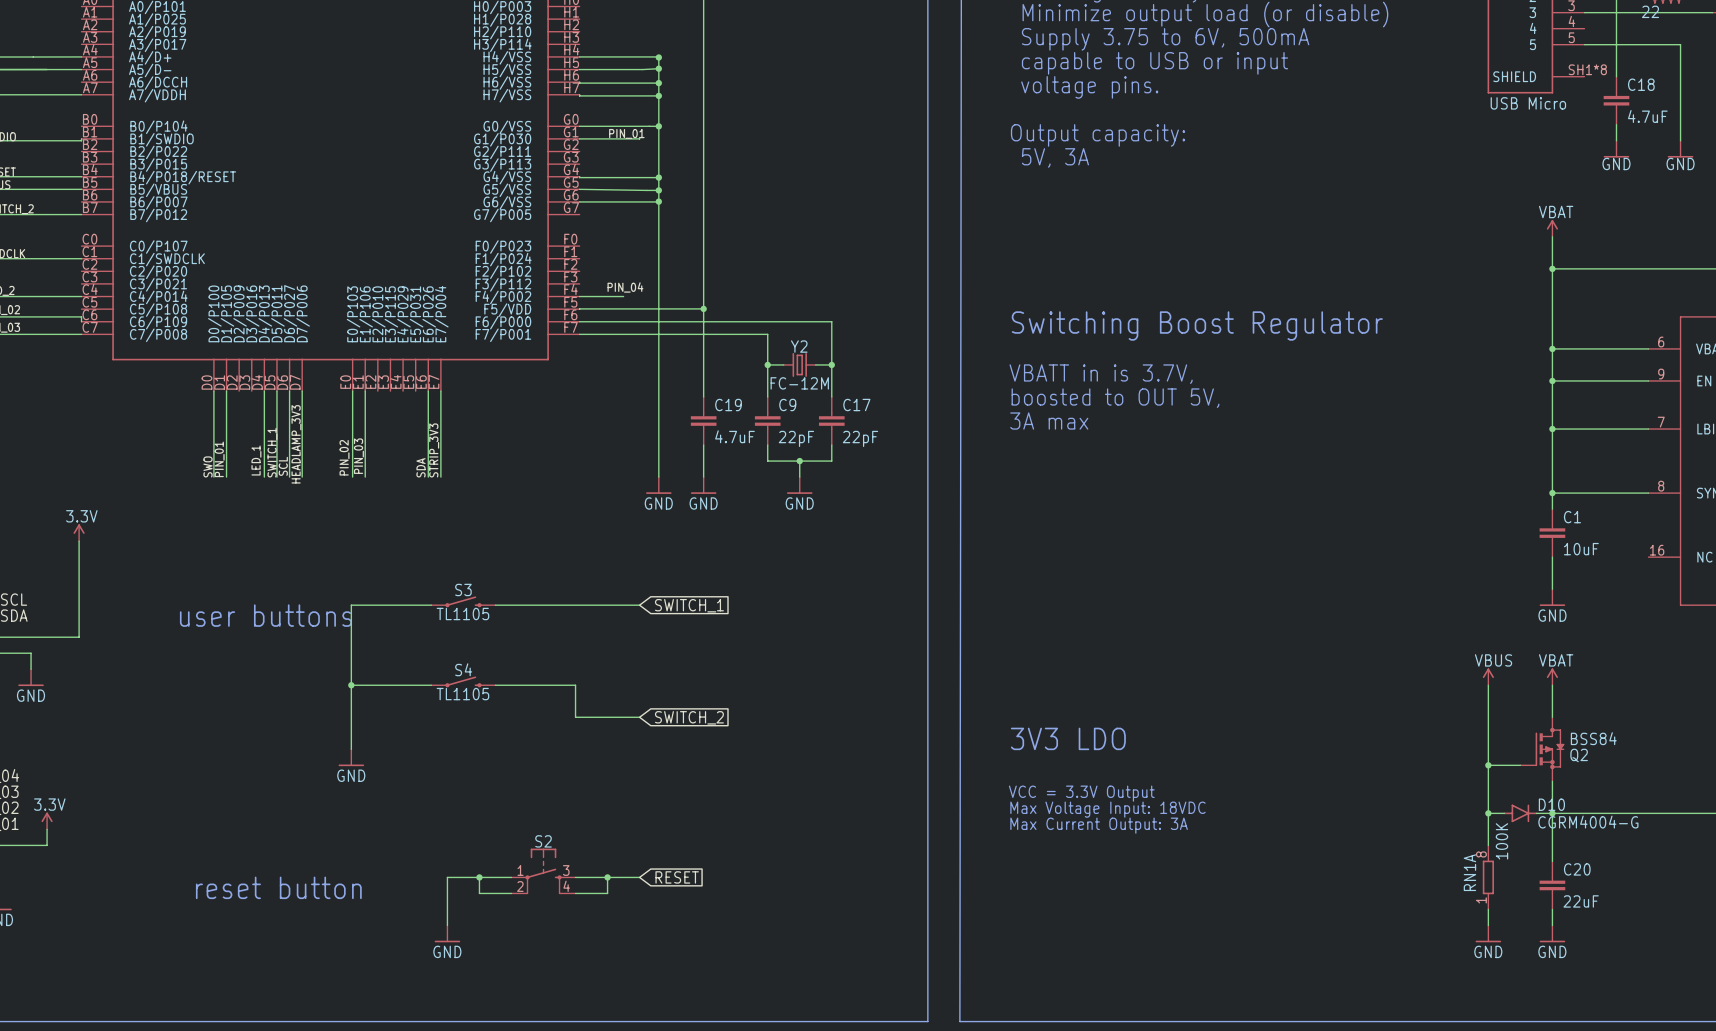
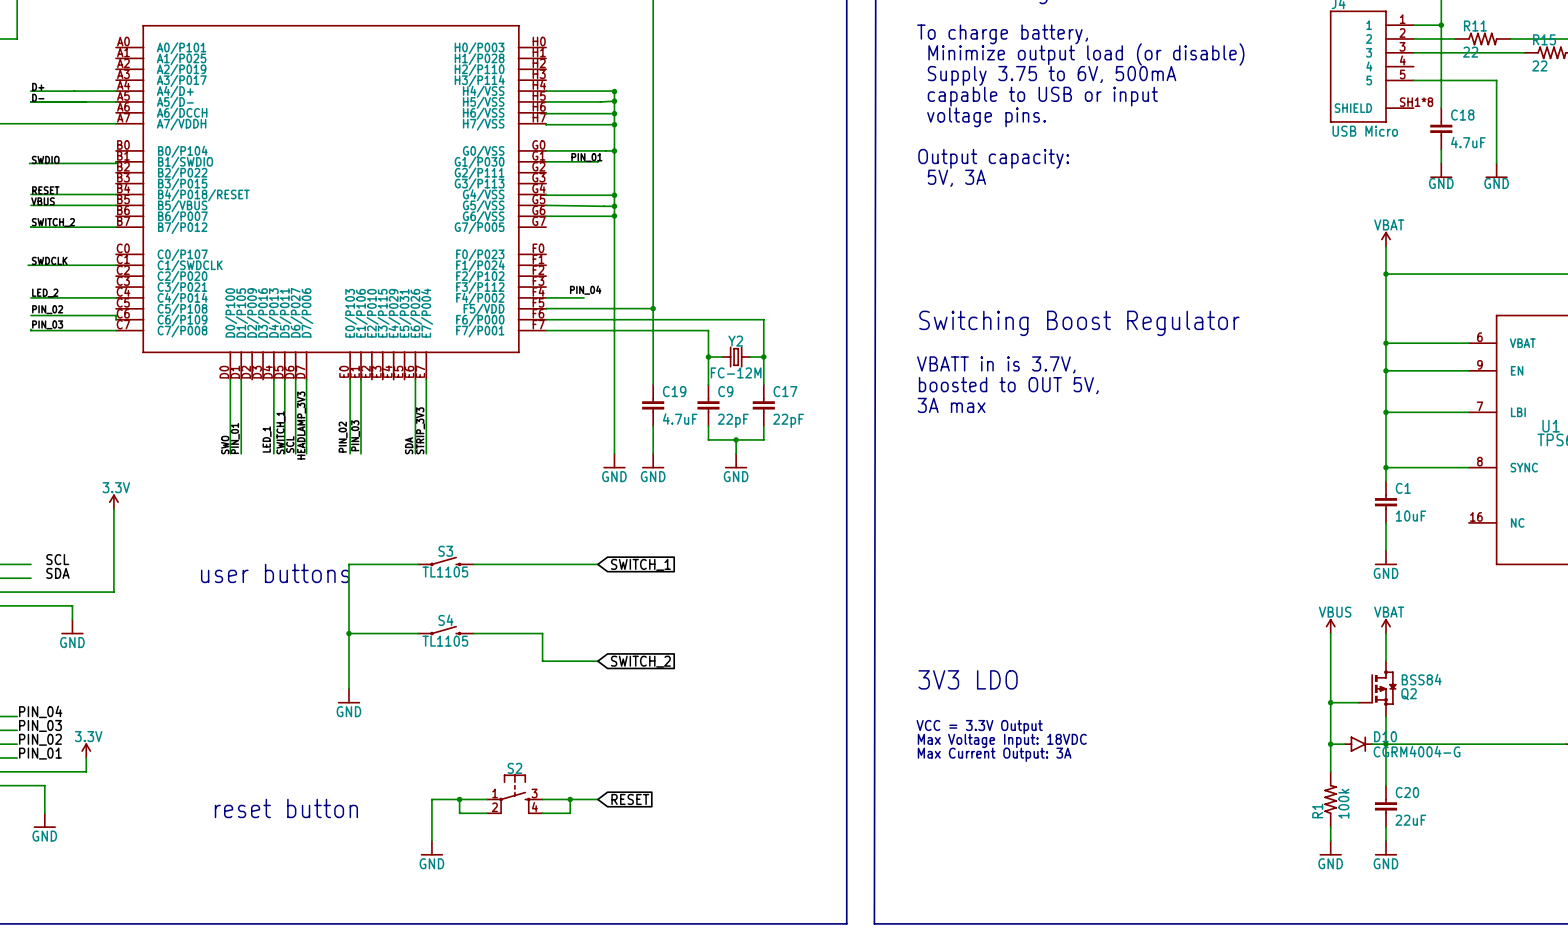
RN1A: 100K (1488, 877) -> none
R1: none -> 100k (1330, 799)

